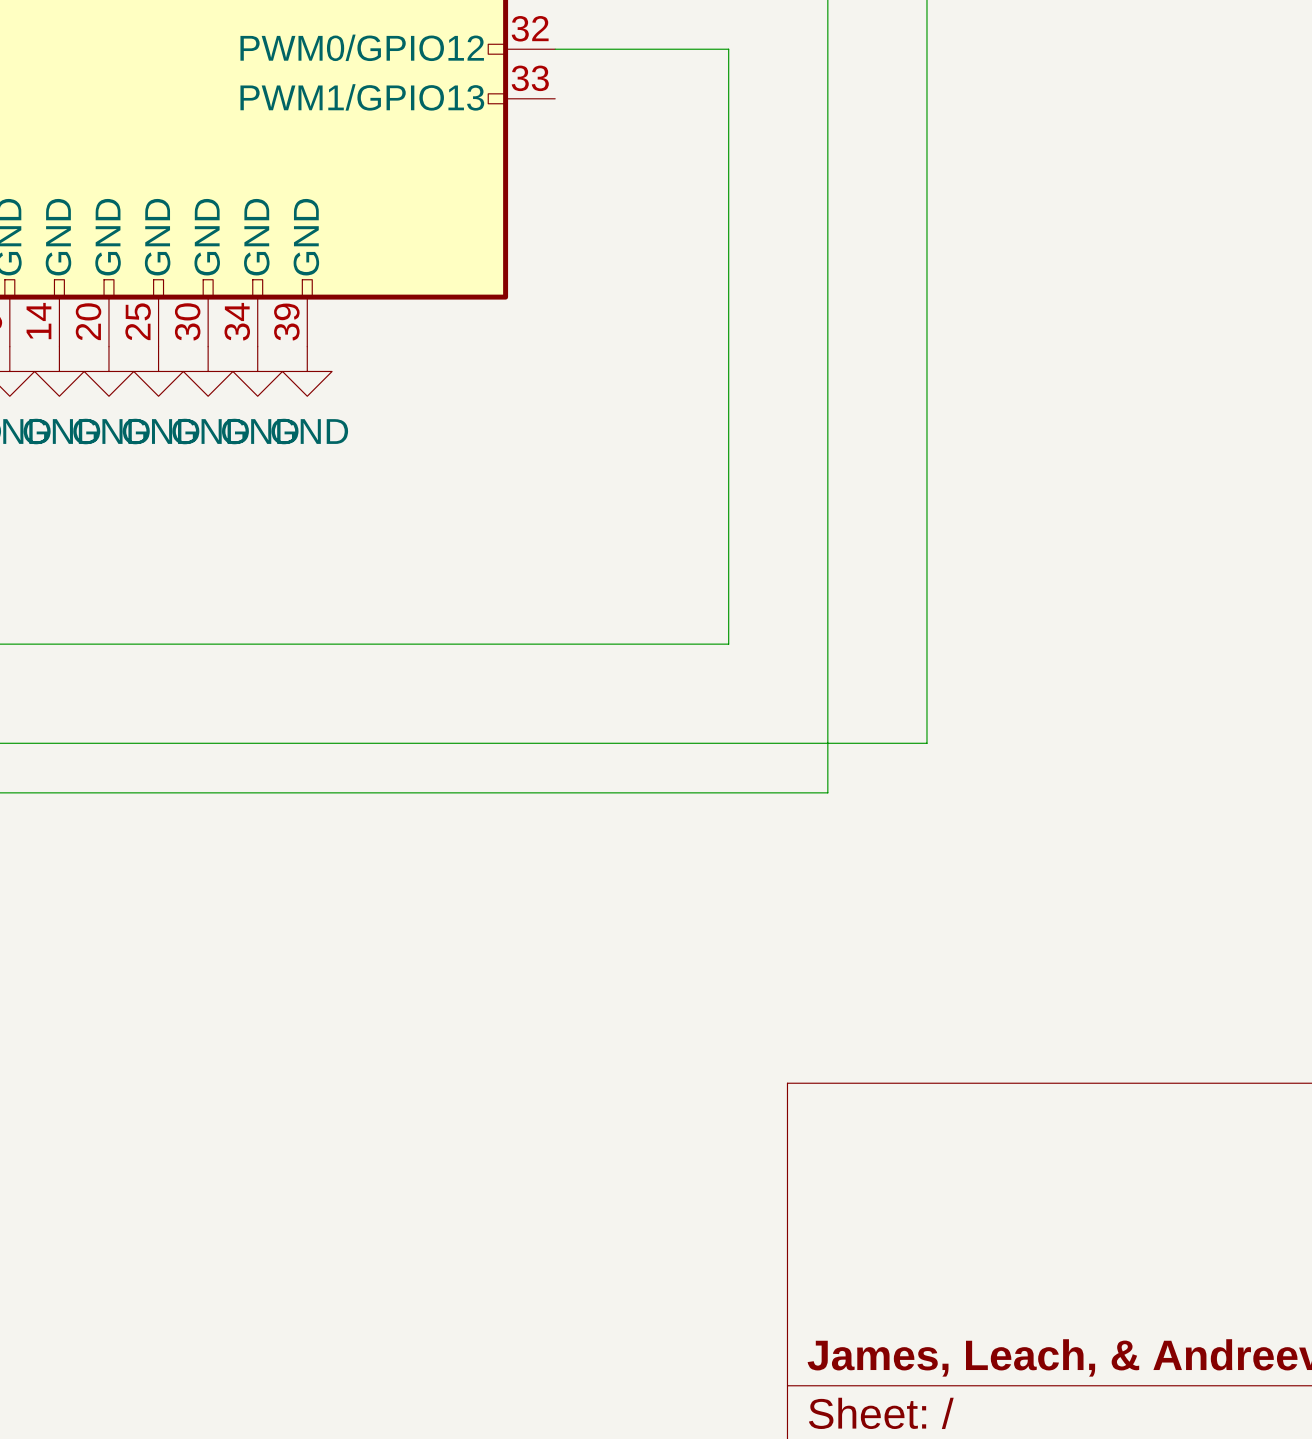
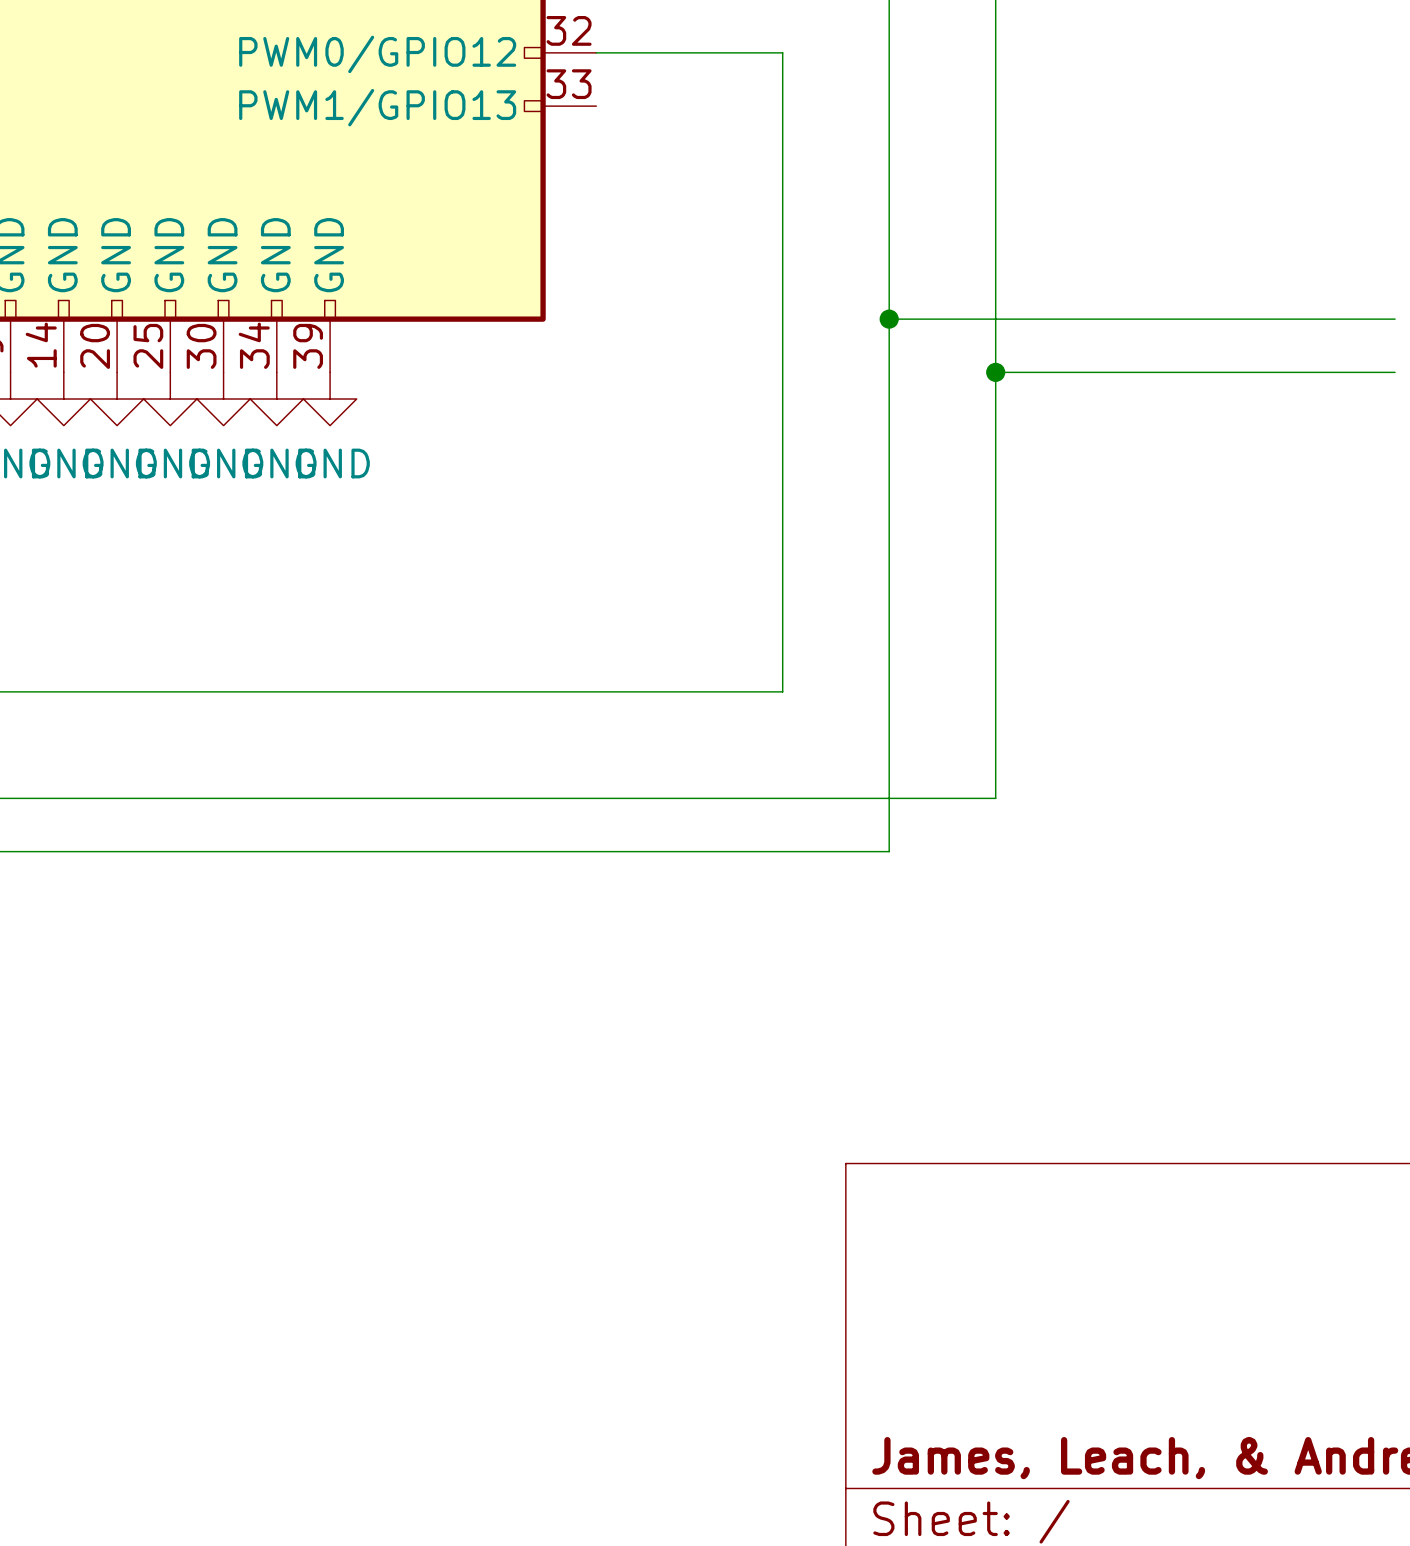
wire: none -> (889, 319) (1395, 319)
junction: none -> (889, 319)
wire: none -> (995, 372) (1395, 372)
junction: none -> (995, 372)

